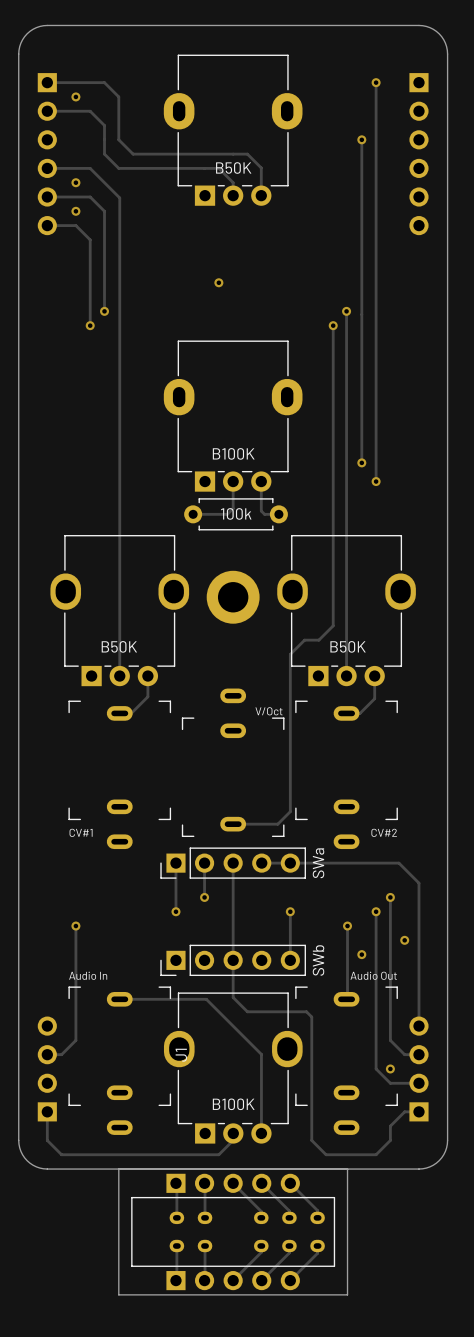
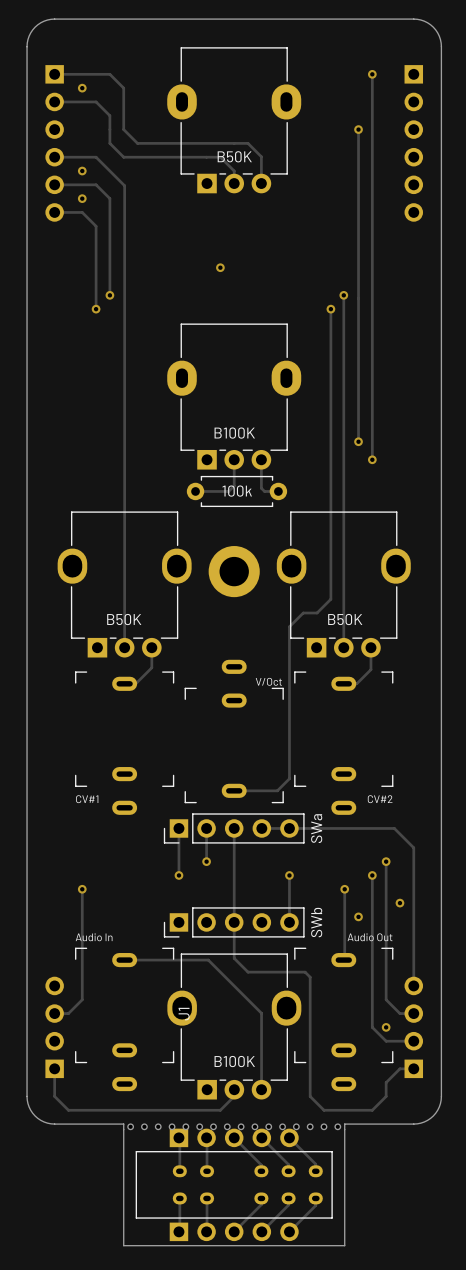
drawing: [18, 24, 449, 1170] -> none
board edge: (118, 1169) (347, 1169) -> (123, 1124) (47, 1123) (32, 1113) (27, 1096) (27, 46) (29, 36) (35, 27) (44, 21) (54, 19) (413, 19) (430, 24) (440, 39) (441, 1100) (433, 1115) (420, 1123) (344, 1124)
part: none -> (130, 1126)
part: none -> (144, 1126)
part: none -> (158, 1126)
part: none -> (172, 1126)
part: none -> (185, 1126)
part: none -> (199, 1126)
part: none -> (213, 1126)
part: none -> (227, 1126)
part: none -> (241, 1126)
part: none -> (254, 1126)
part: none -> (268, 1126)
part: none -> (282, 1126)
part: none -> (296, 1126)
part: none -> (310, 1126)
part: none -> (323, 1126)
part: none -> (337, 1126)

